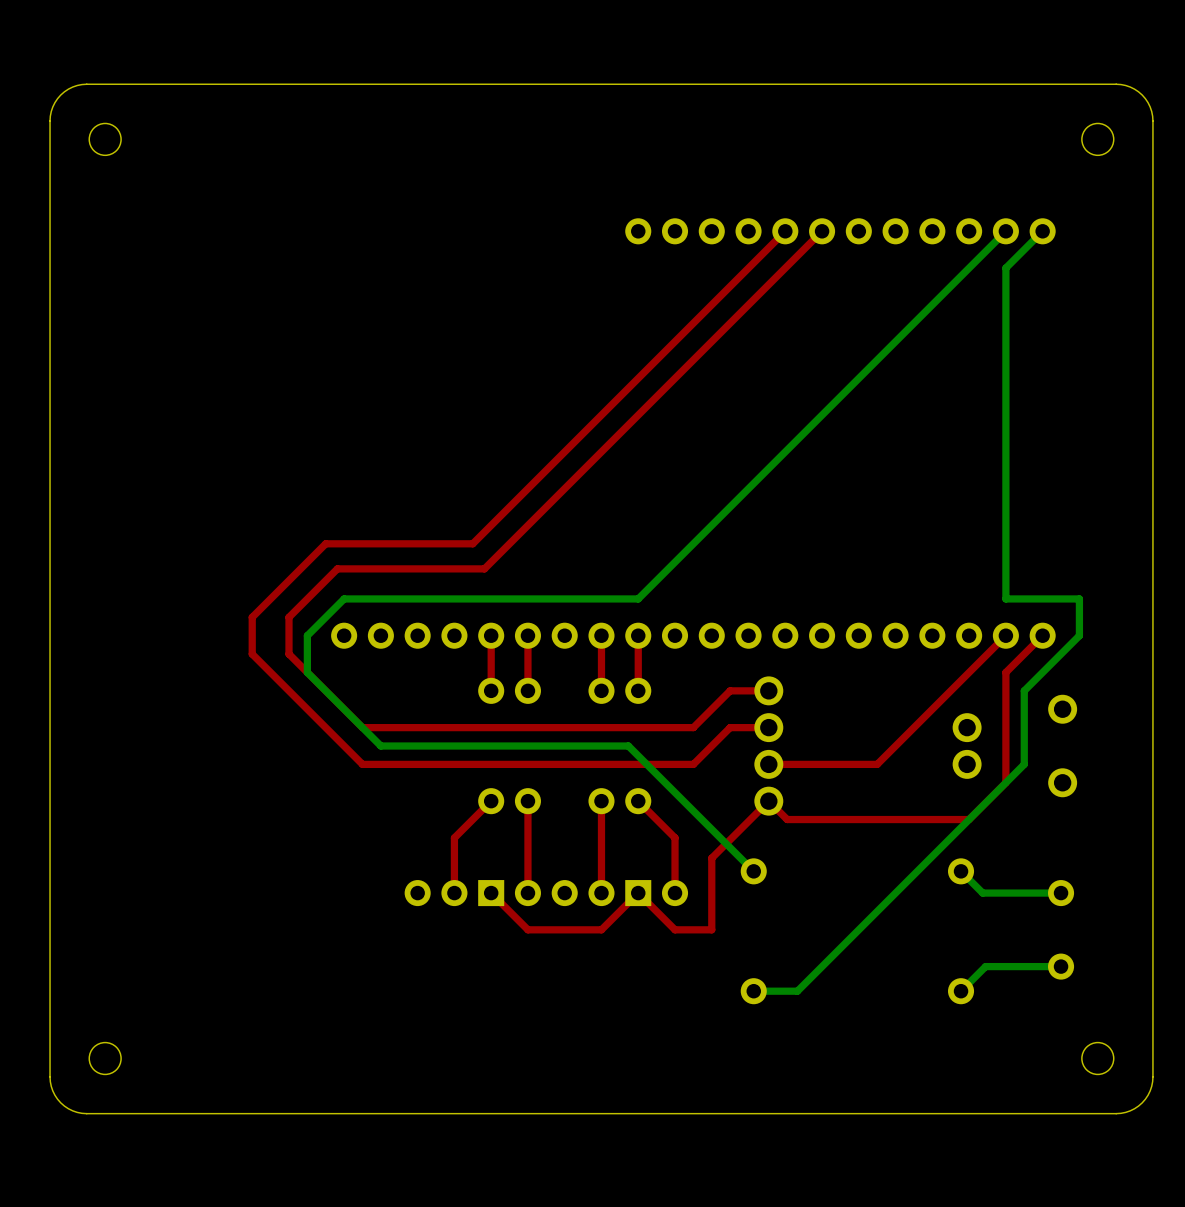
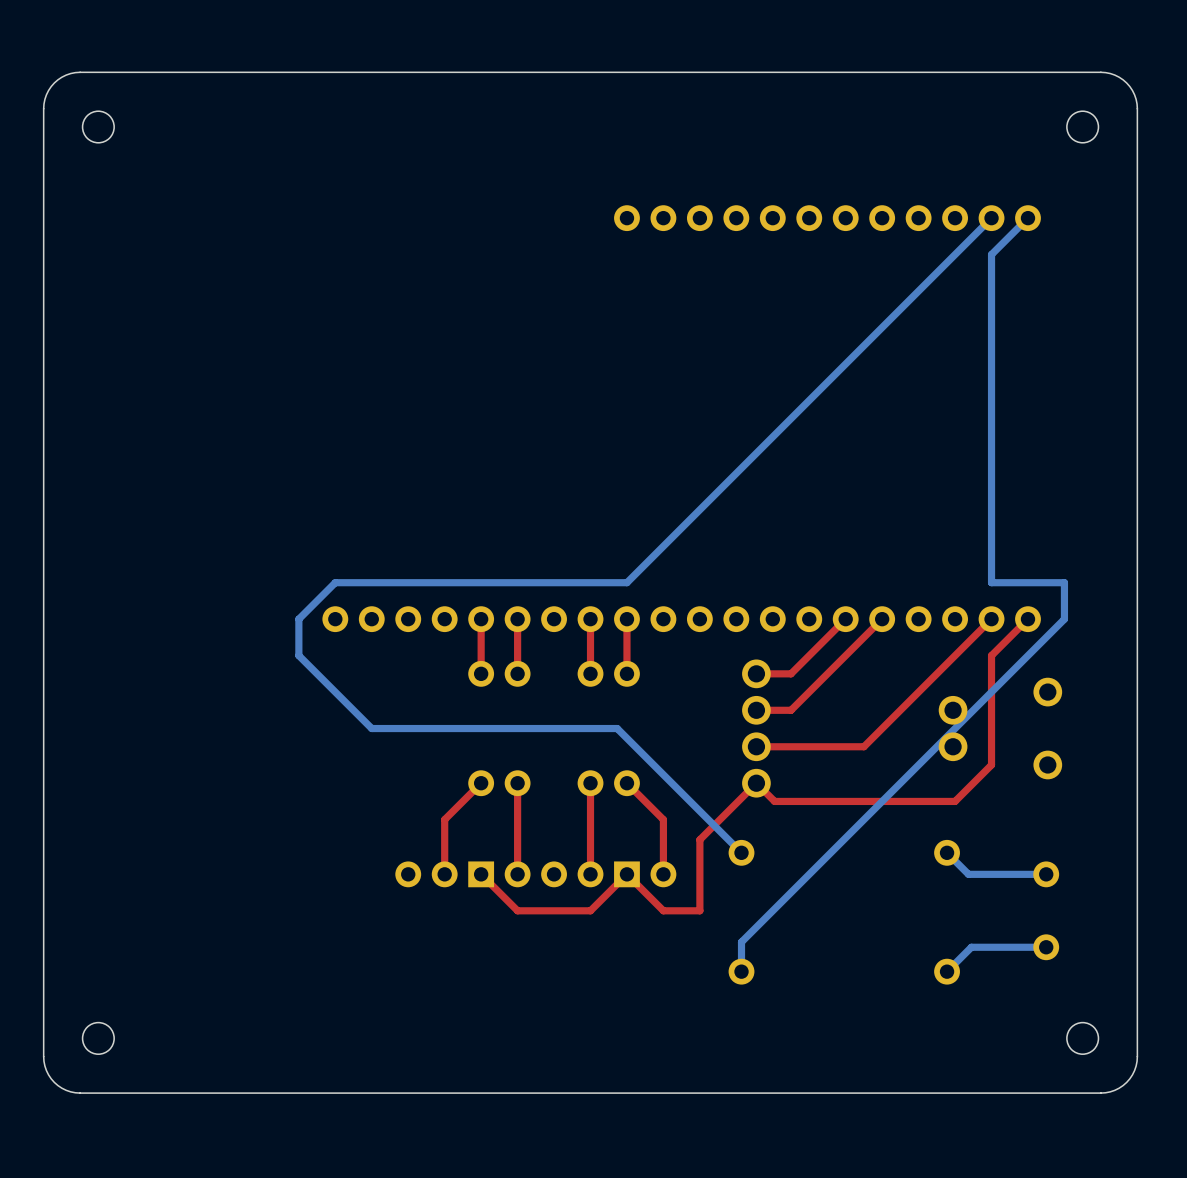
top track: (785, 231) (472, 543) (325, 543) (252, 617) (252, 654) (362, 764) (693, 764) (730, 727) (768, 727) -> (882, 619) (791, 710) (756, 710)
top track: (822, 231) (484, 568) (337, 568) (288, 617) (288, 654) (362, 727) (693, 727) (730, 690) (768, 690) -> (845, 619) (791, 673) (756, 673)
bottom track: (1024, 690) (1024, 764) (797, 991) (753, 991) -> (1009, 673) (741, 942) (741, 971)

